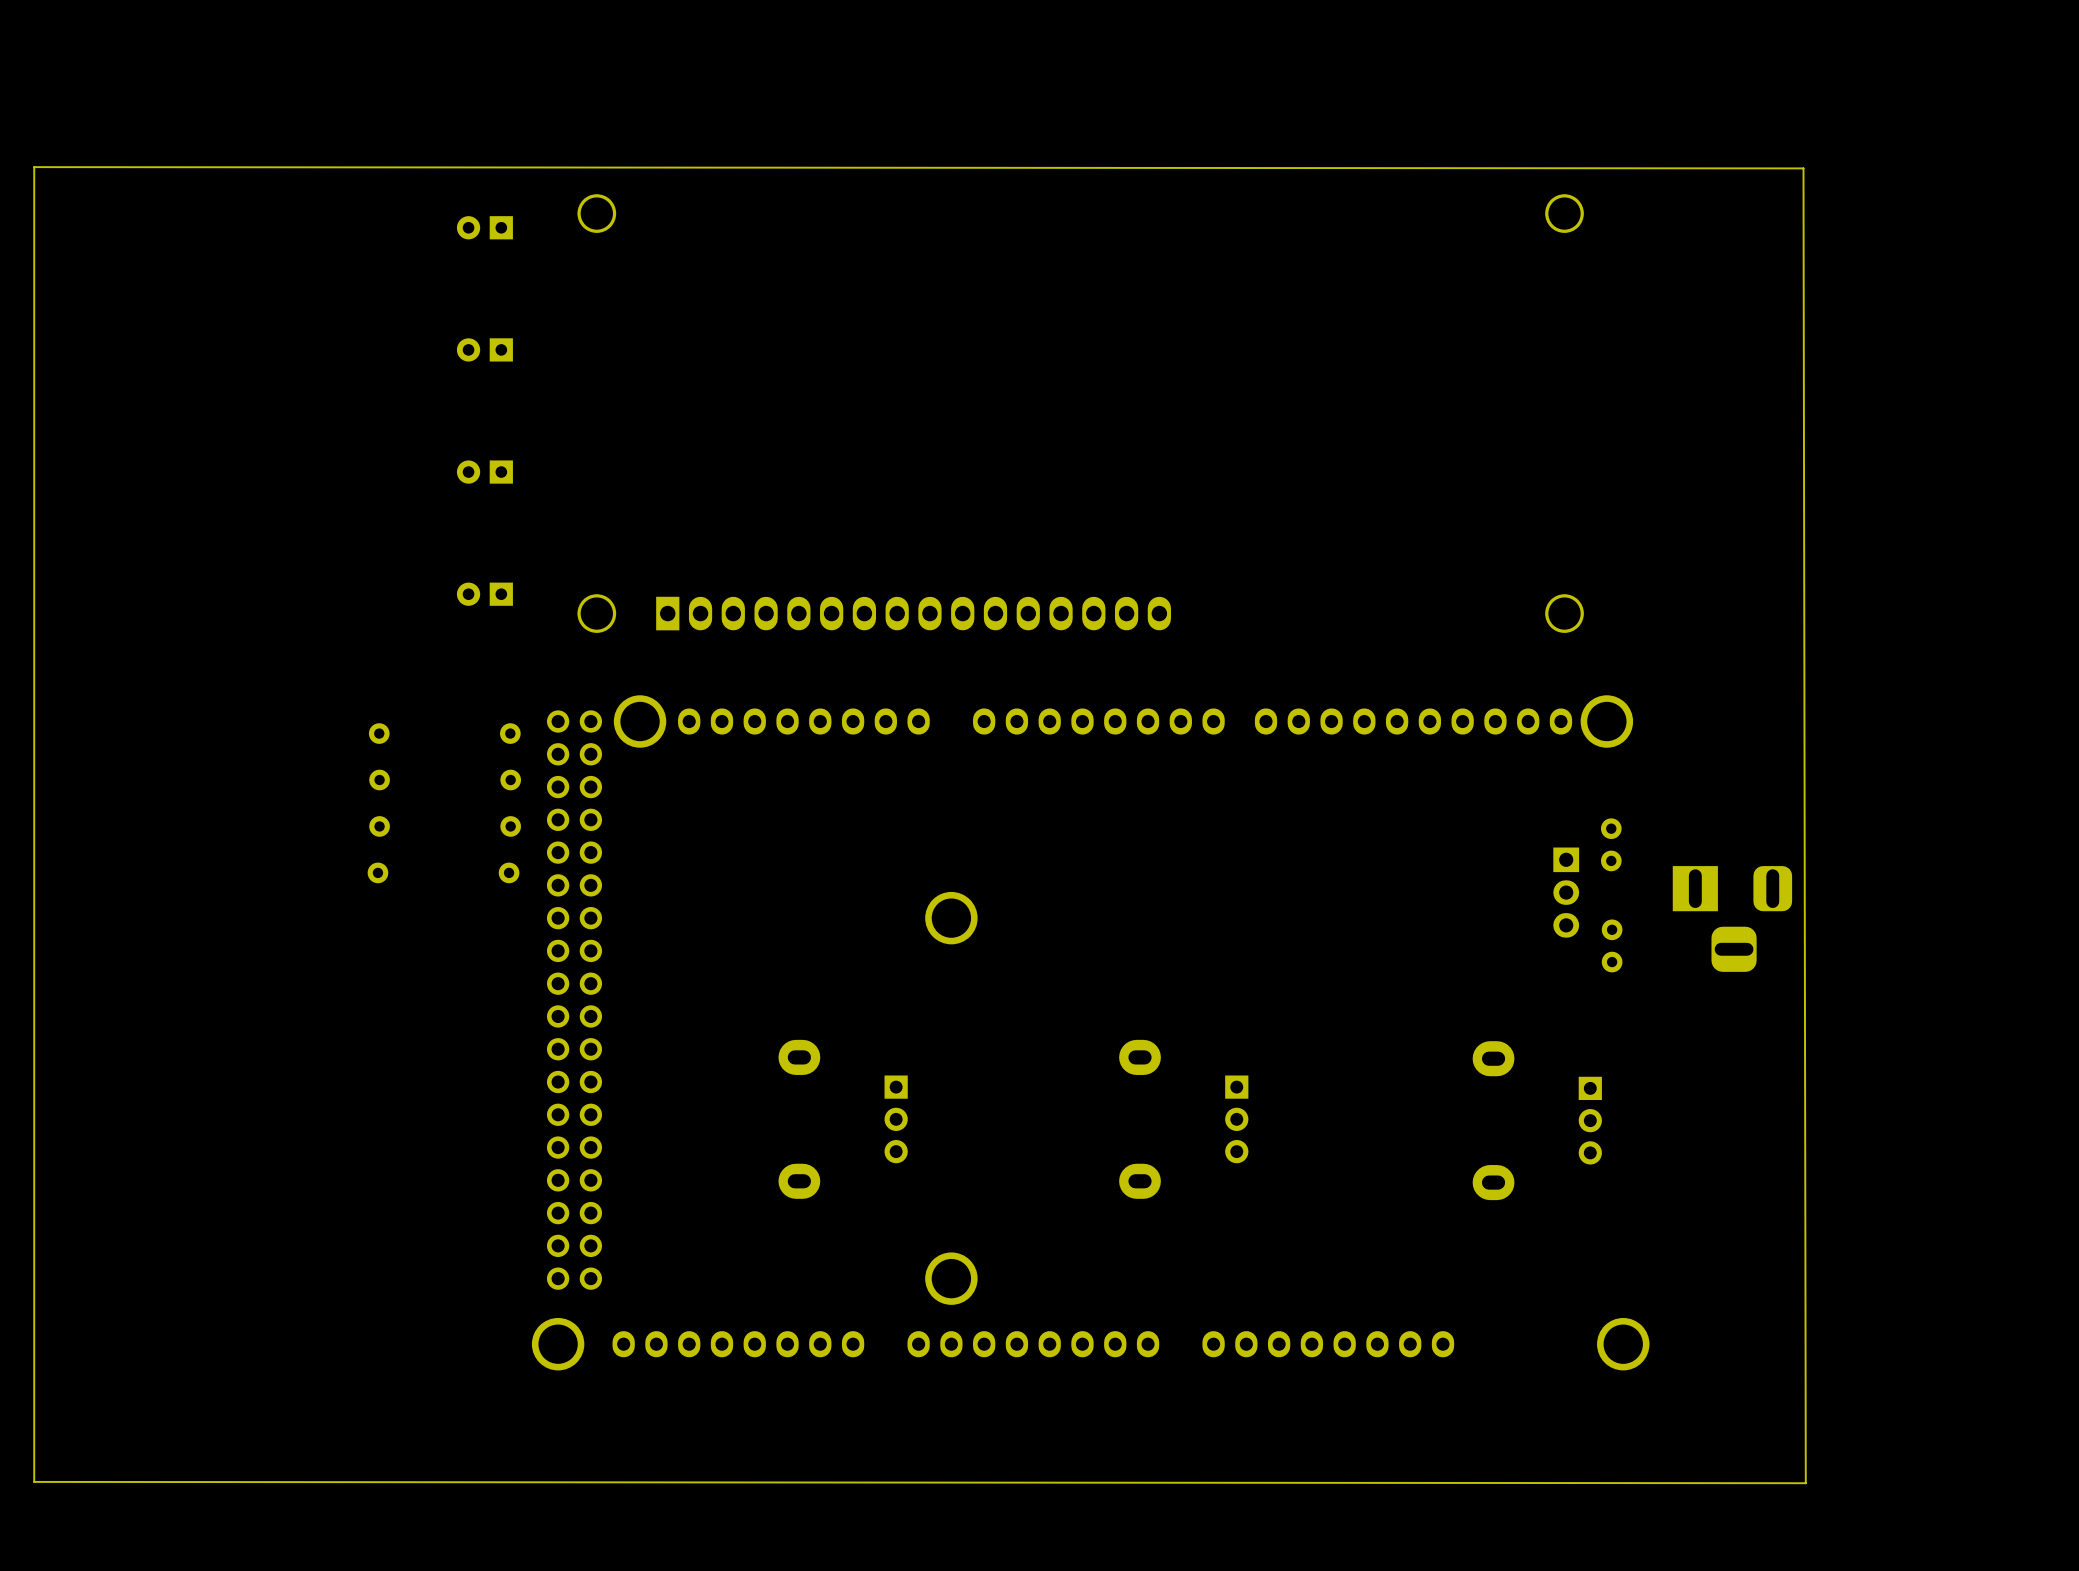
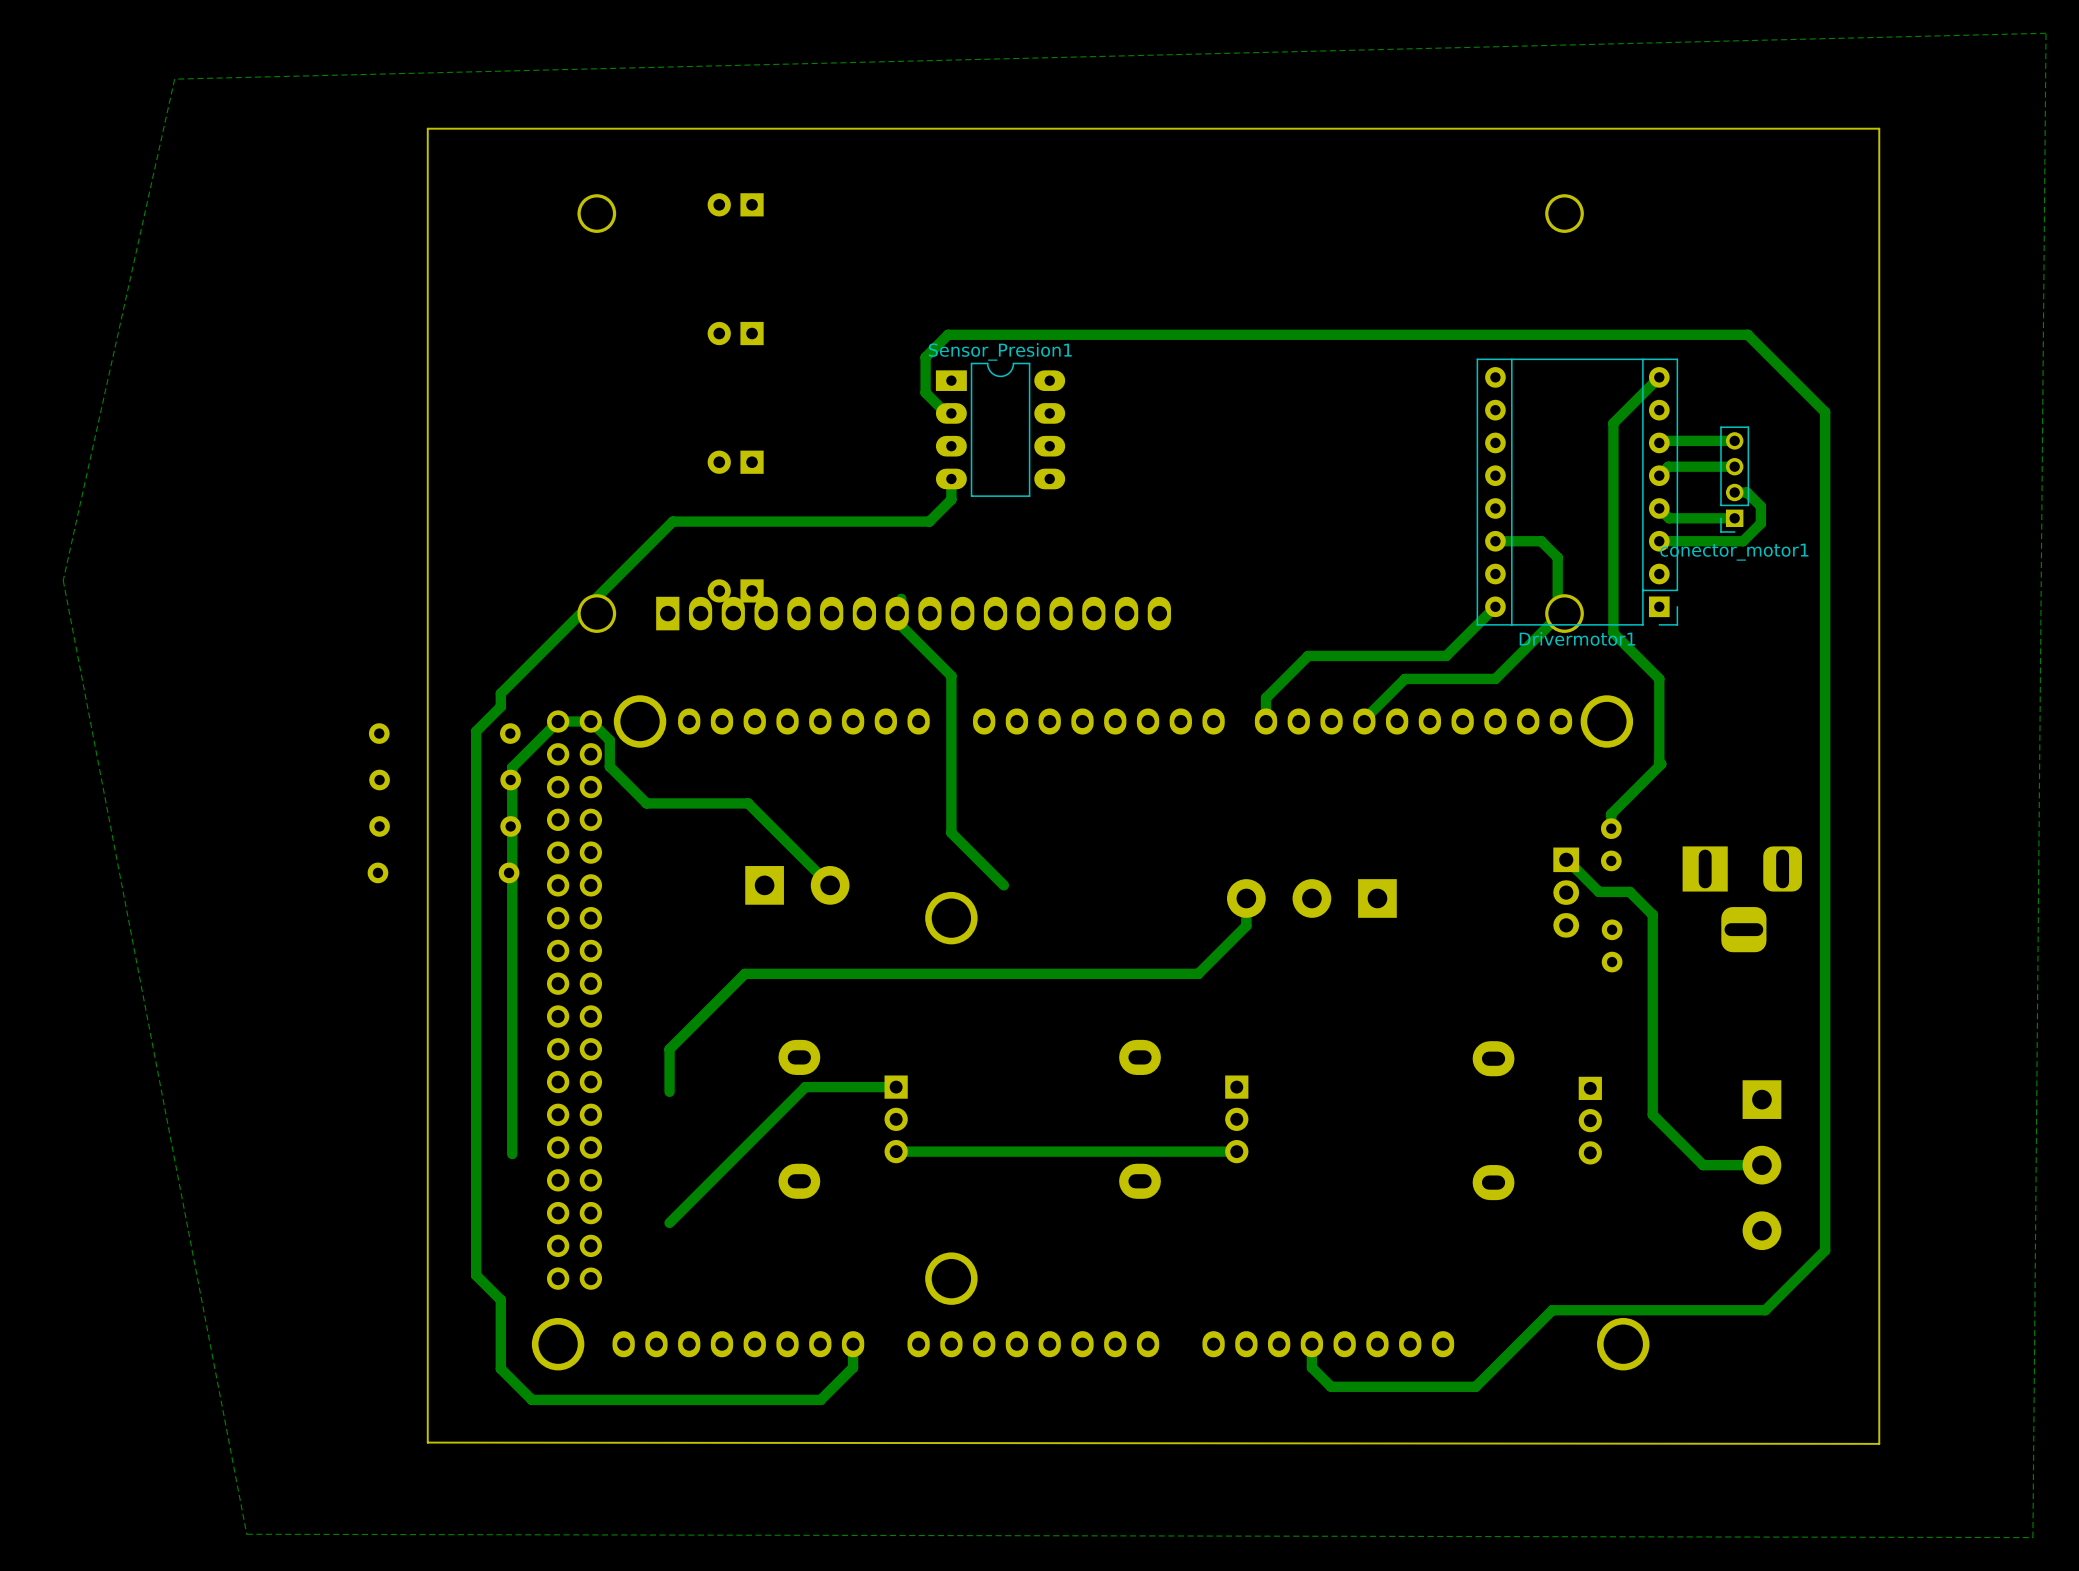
zone outline: none -> (2046, 33) (2032, 1537) (246, 1534) (63, 580) (174, 79) (2046, 33)
board edge: (34, 167) (34, 1481) (1805, 1483) (1803, 168) (34, 167) -> (1879, 128) (1879, 1443) (427, 1442) (427, 128) (1879, 128)
part: none -> (735, 204)
part: (484, 227) -> none
part: none -> (735, 333)
part: (484, 349) -> none
track: none -> (1659, 377) (1613, 423) (1613, 633) (1659, 678) (1659, 762) (1661, 764) (1611, 814) (1611, 828)
track: none -> (951, 413) (946, 413) (925, 392) (925, 357) (948, 334) (1747, 334) (1825, 412) (1825, 1250) (1765, 1310) (1552, 1310) (1475, 1386) (1331, 1386) (1311, 1367) (1311, 1344)
Sensor_Presion1: none -> (1000, 429)
track: none -> (1734, 440) (1661, 440) (1659, 442)
part: none -> (735, 462)
track: none -> (1734, 466) (1668, 466) (1659, 475)
part: (484, 472) -> none
track: none -> (951, 478) (951, 499) (929, 521) (672, 521) (500, 693) (500, 706) (476, 731) (476, 1275) (500, 1299) (500, 1368) (531, 1399) (820, 1399) (853, 1367) (853, 1344)
conector_motor1: none -> (1734, 479)
Drivermotor1: none -> (1577, 492)
track: none -> (1734, 492) (1746, 492) (1760, 506) (1760, 523) (1743, 541) (1659, 541)
track: none -> (1659, 508) (1669, 518) (1734, 518)
track: none -> (1495, 541) (1541, 541) (1557, 557) (1557, 616) (1495, 678) (1404, 678) (1364, 721)
part: none -> (735, 590)
part: (484, 594) -> none
track: none -> (901, 598) (901, 625) (951, 675) (951, 832) (1003, 885)
track: none -> (1495, 606) (1446, 655) (1308, 655) (1266, 698) (1266, 721)
track: none -> (1566, 859) (1598, 891) (1629, 891) (1652, 914) (1652, 1114) (1703, 1165) (1761, 1165)
part: none -> (797, 885)
track: none -> (830, 885) (748, 803) (646, 803) (609, 766) (609, 740) (590, 721) (558, 721) (512, 767) (512, 1154)
track: none -> (1246, 898) (1246, 925) (1198, 973) (744, 973) (669, 1049) (669, 1091)
part: none -> (1311, 898)
part position: (1732, 918) -> (1742, 899)
track: none -> (896, 1087) (805, 1087) (669, 1222)
track: none -> (1236, 1151) (896, 1151)
part: none -> (1761, 1165)

